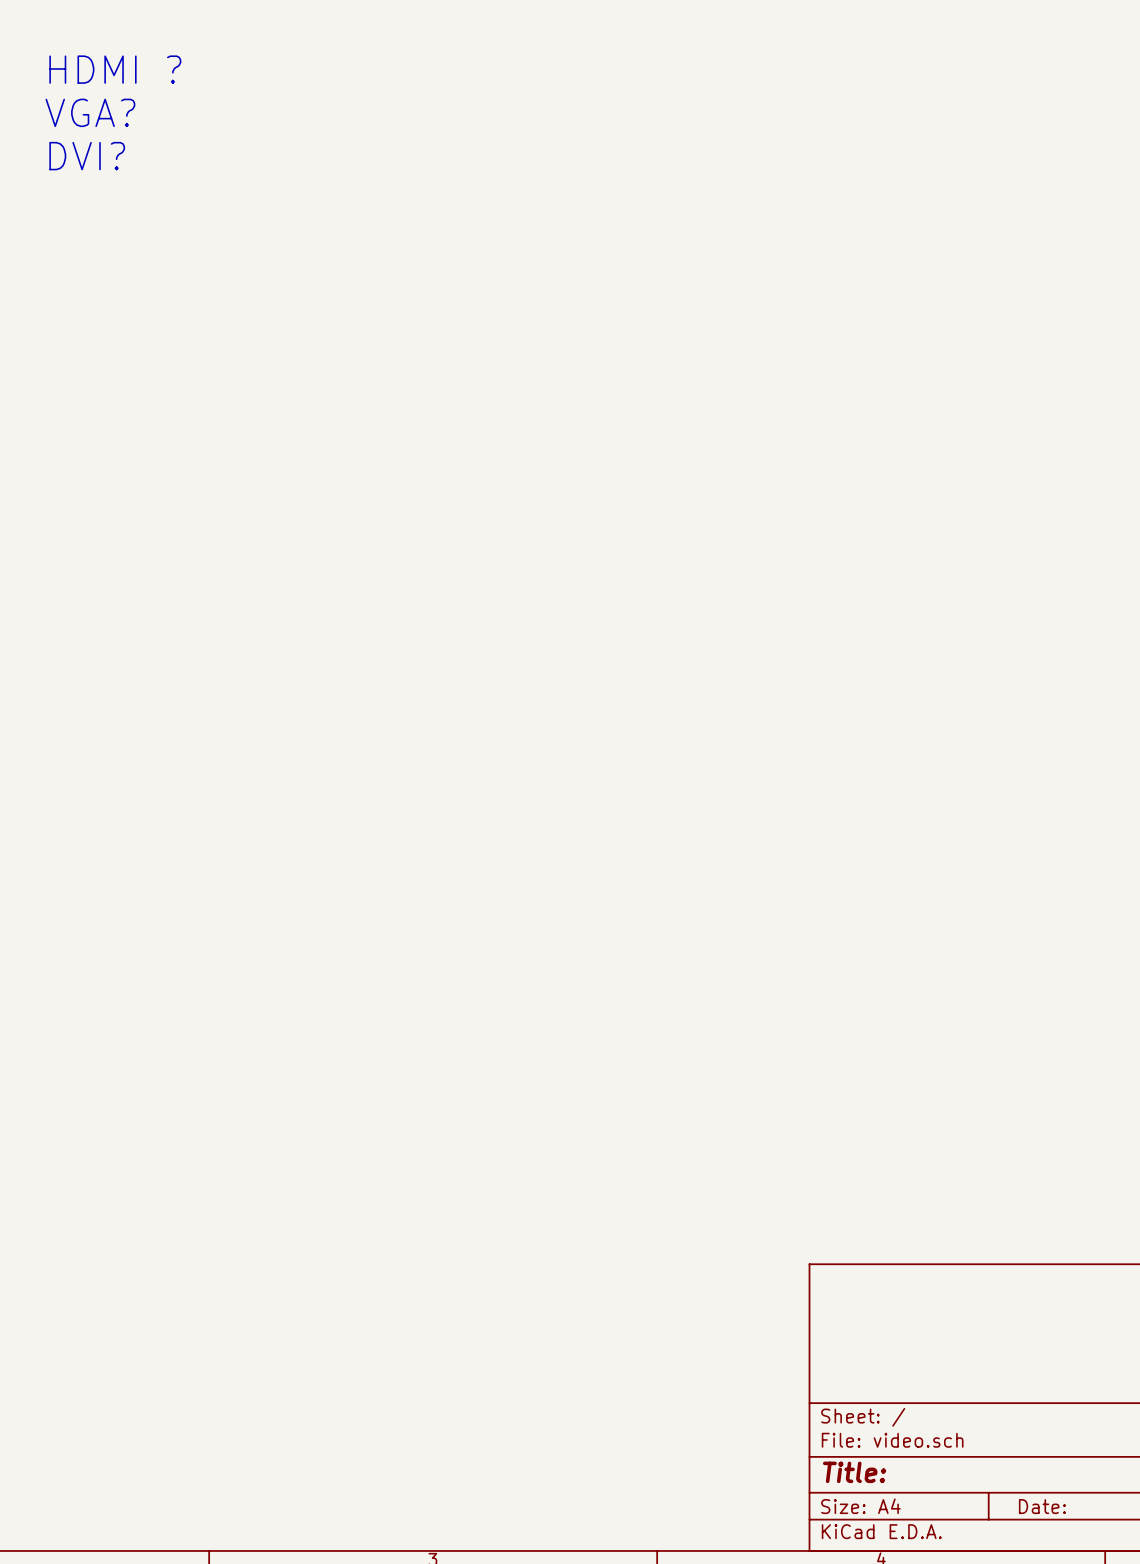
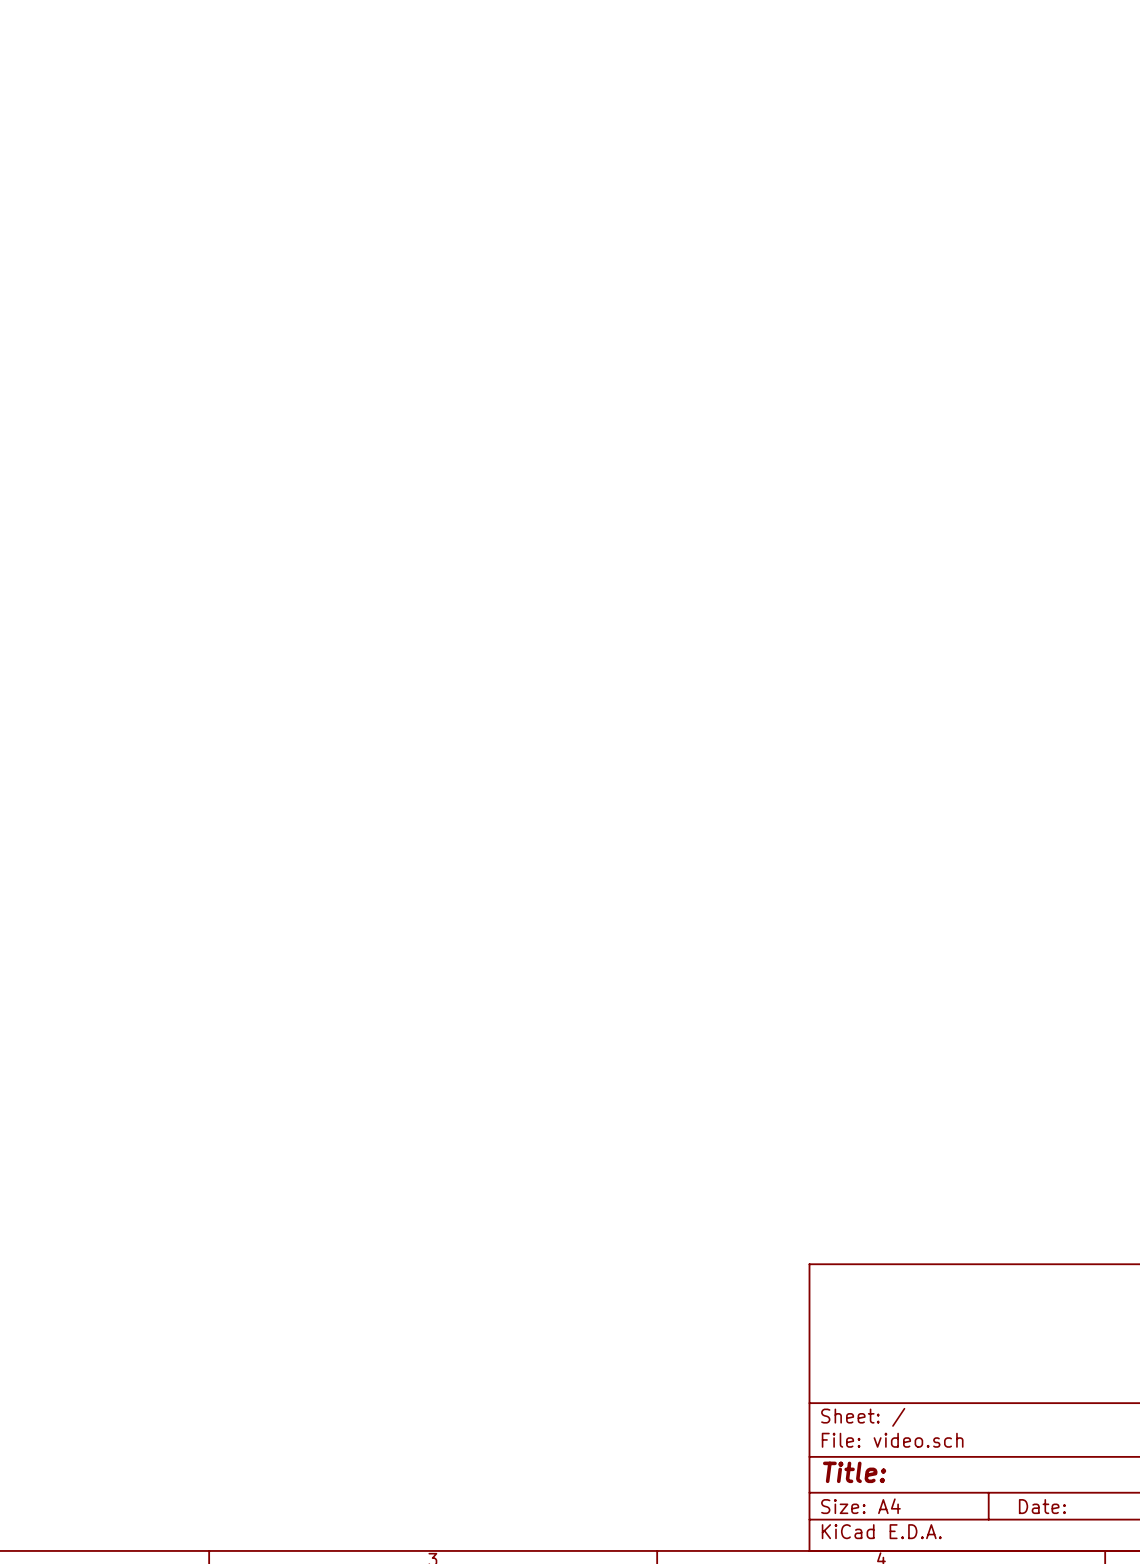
text: HDMI ? (115, 69) -> none
text: VGA? (90, 112) -> none
text: DVI? (87, 156) -> none

